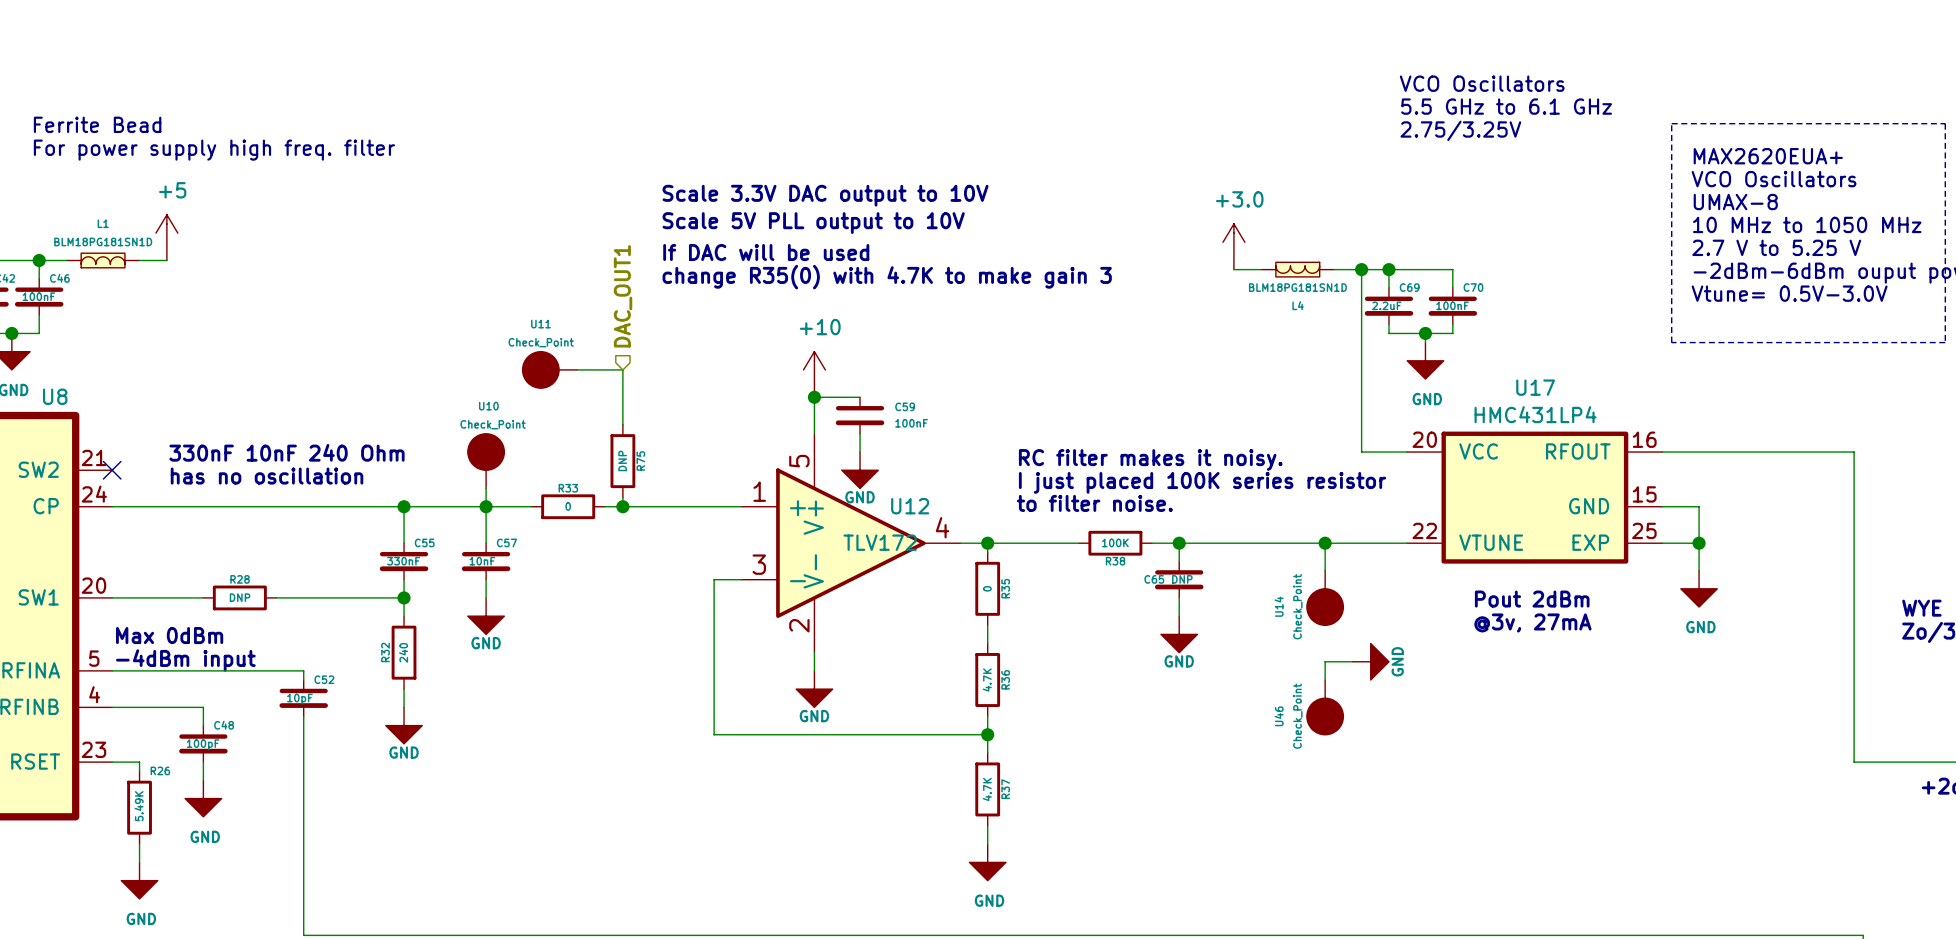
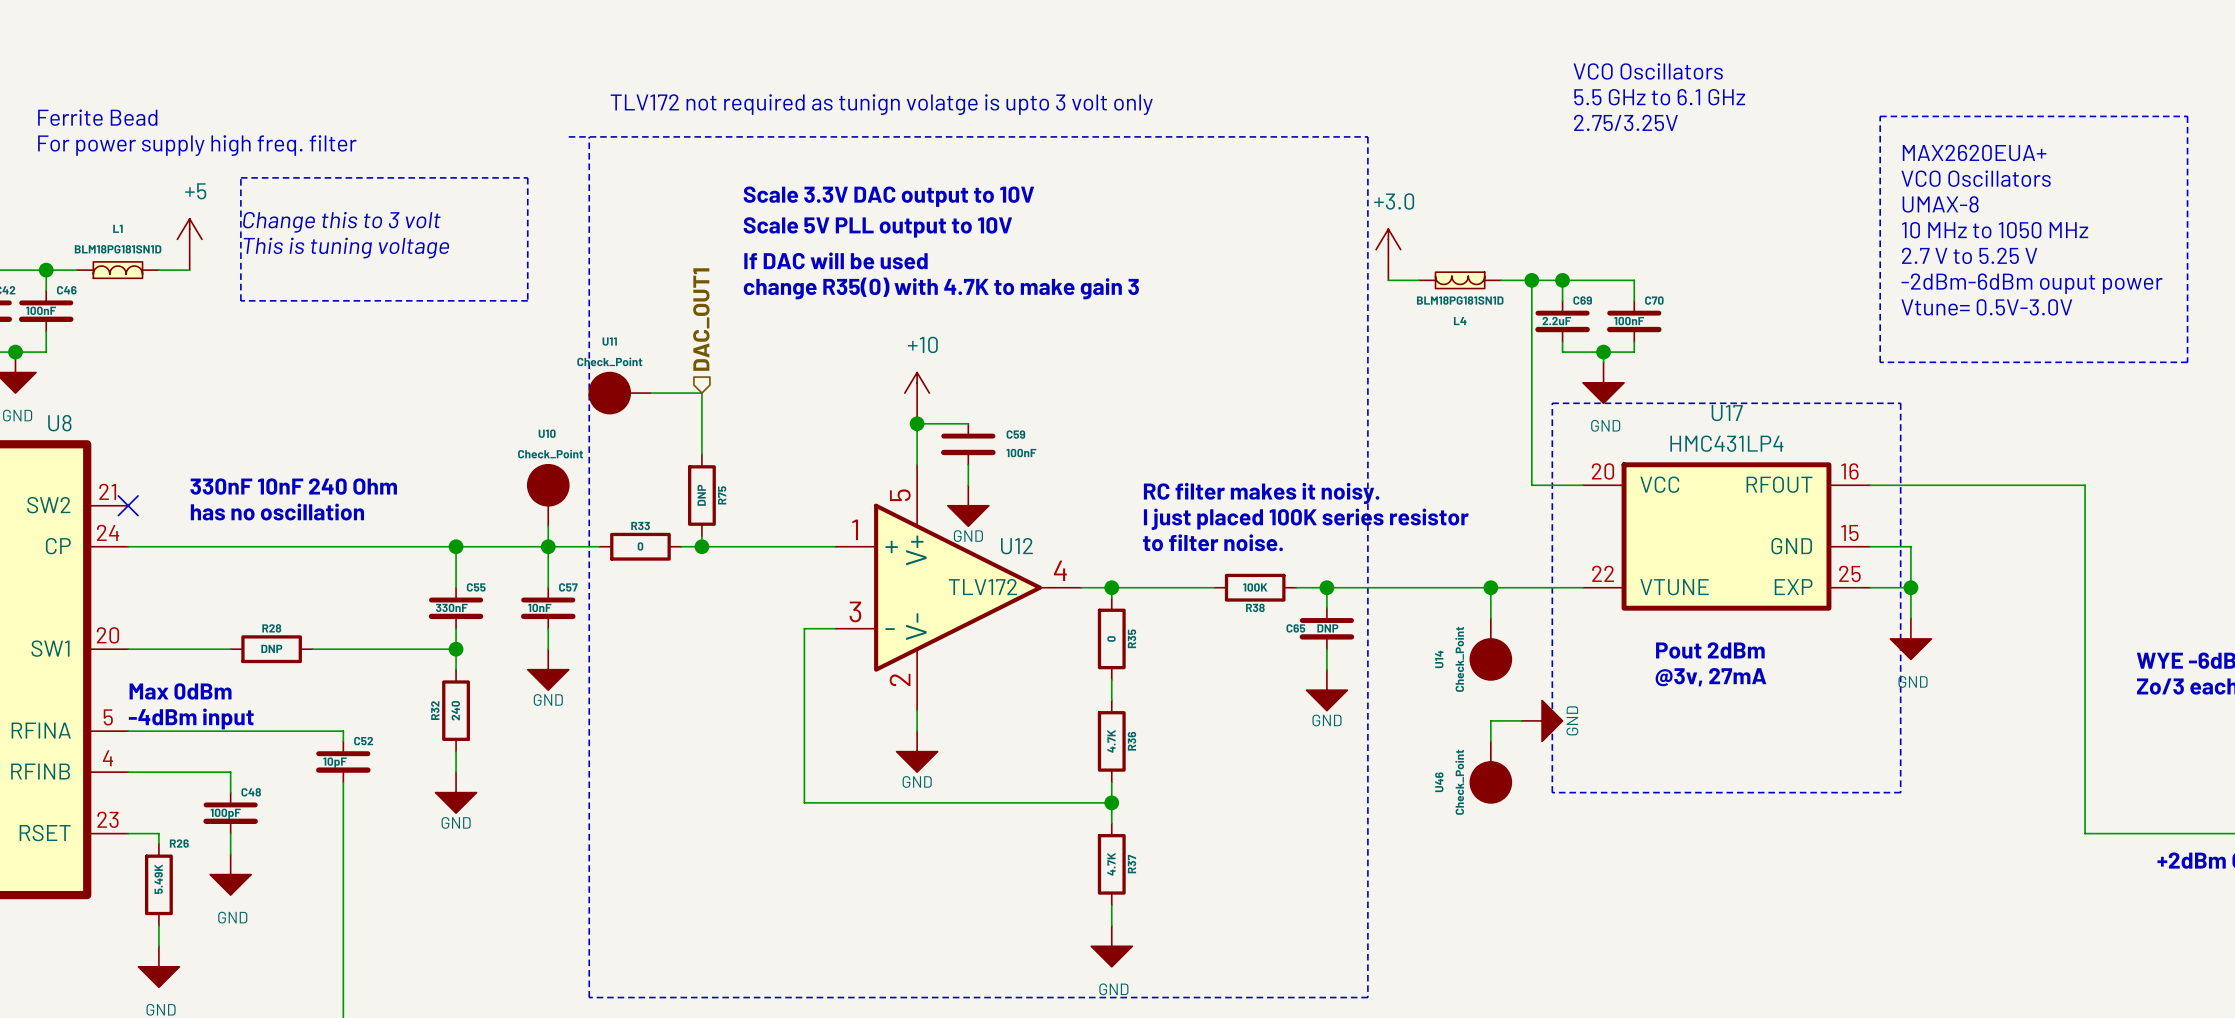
text: none -> TLV172 not required as tunign volatge is upto 3 volt only (881, 104)
line: none -> (568, 136) (1367, 136) (1367, 997) (589, 997) (589, 136)
line: none -> (240, 177) (527, 177) (527, 300) (240, 300) (240, 177)
text: none -> Change this to 3 volt (341, 222)
text: none -> This is tuning voltage (346, 248)
line: none -> (1552, 403) (1900, 403) (1900, 792) (1552, 792) (1552, 403)

